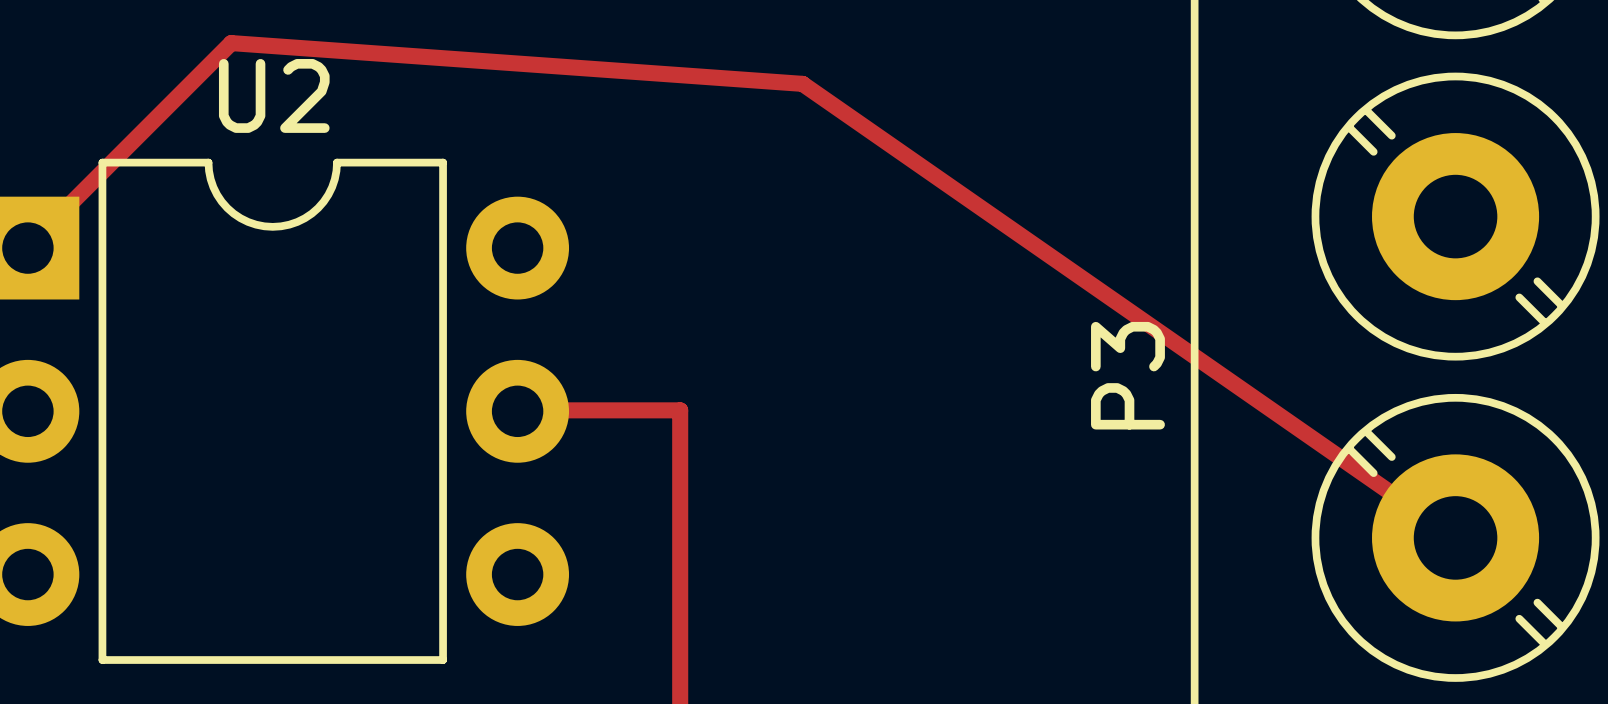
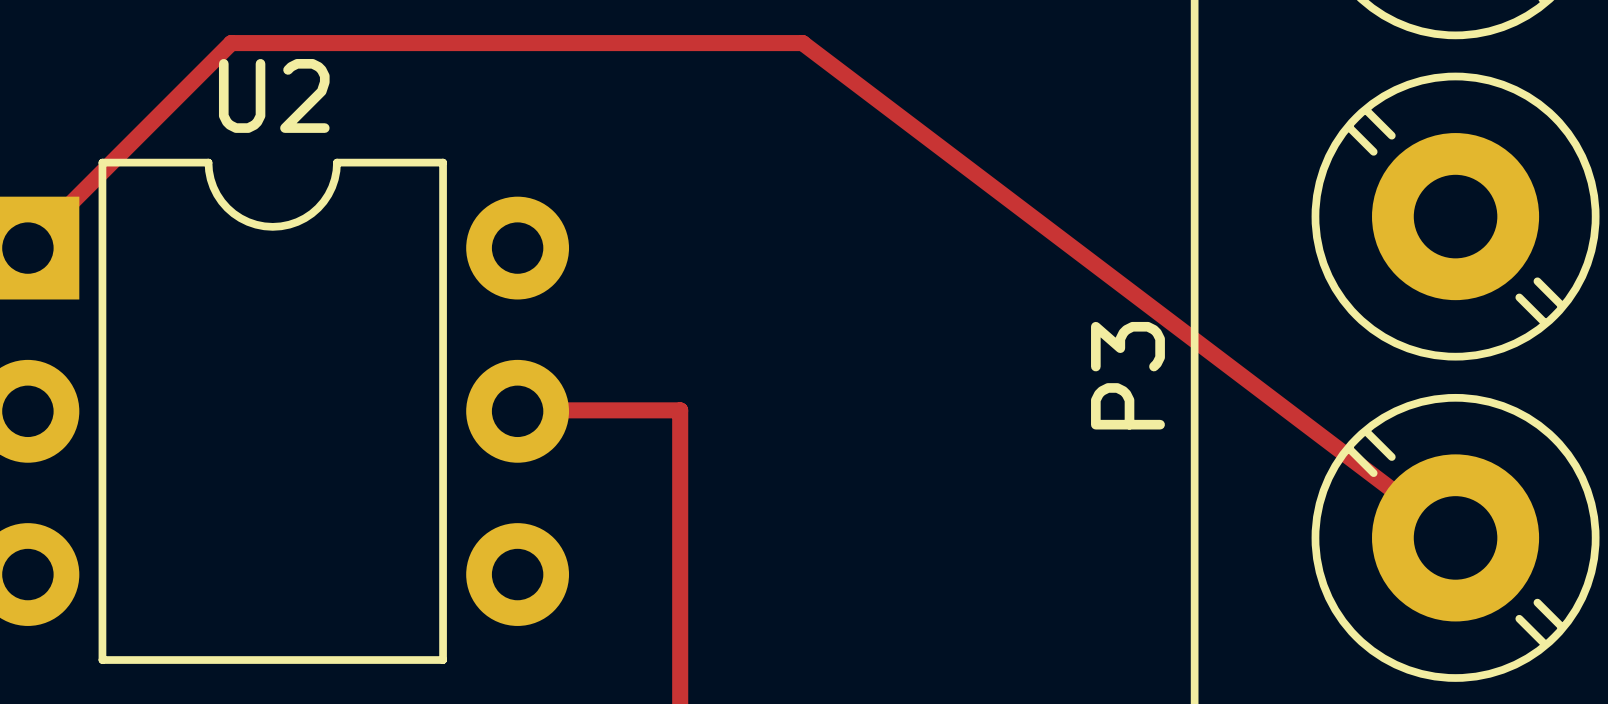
track: (231, 43) (802, 83) (1455, 537) -> (231, 43) (802, 43) (1455, 537)

